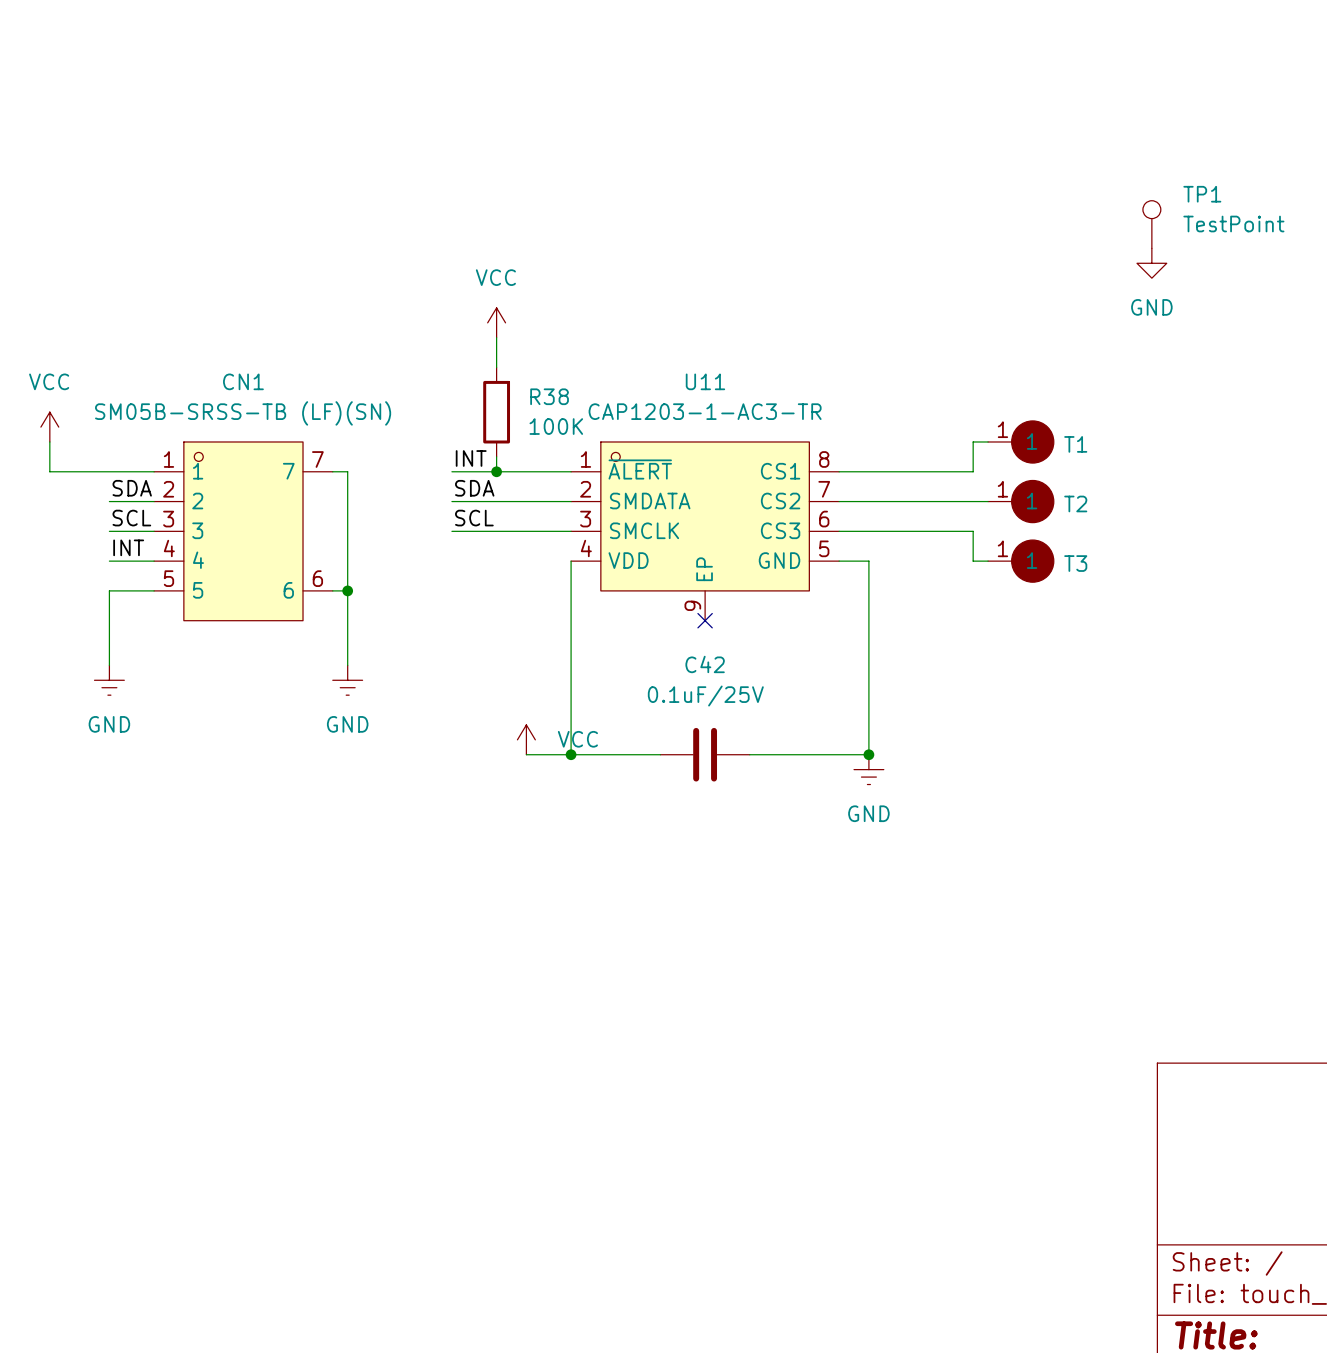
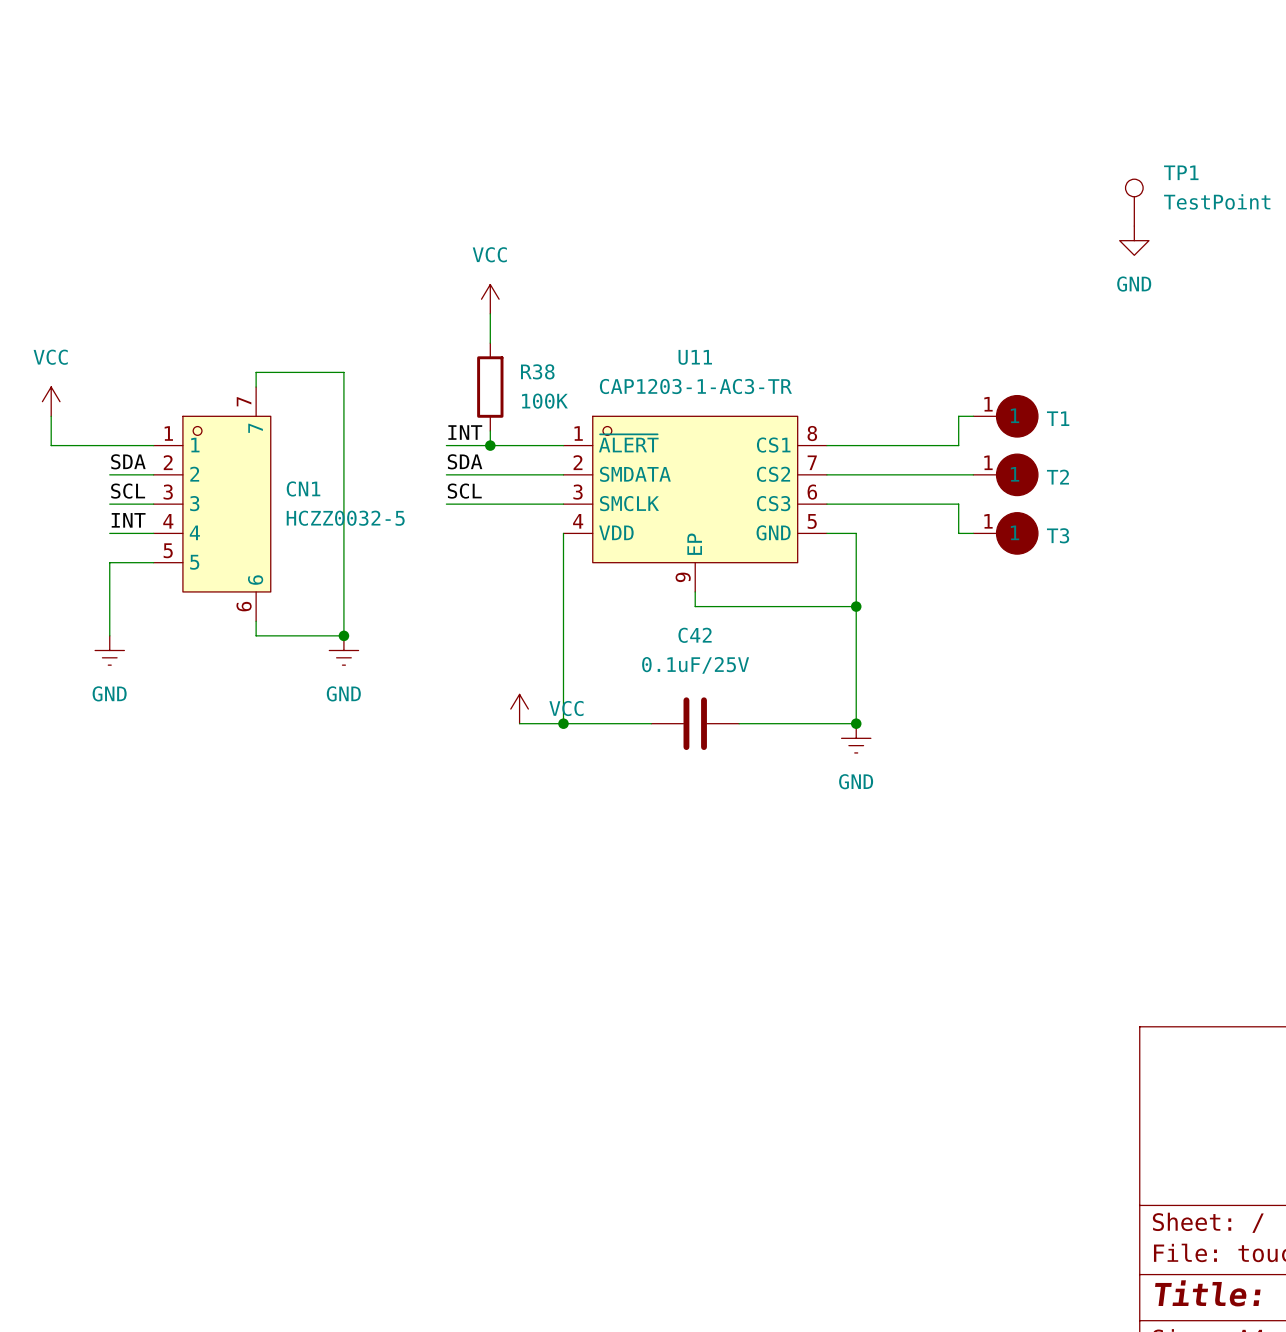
CN1 name position: CN1 (243, 381) -> CN1 (303, 488)
CN1 value: SM05B-SRSS-TB (LF)(SN) (243, 413) -> HCZZ0032-5 (345, 518)
CN1 symbol: [154, 441, 333, 621] -> [153, 387, 271, 622]
wire: (332, 471) (347, 471) -> (256, 387) (256, 372) (343, 372) (343, 445)
wire: (332, 590) (347, 590) -> none
junction: (347, 590) -> none
wire: none -> (695, 591) (695, 606) (856, 606)
no-connect mark: (705, 620) -> none
junction: none -> (856, 606)
wire: none -> (256, 621) (256, 635) (343, 635)
junction: none -> (343, 635)

